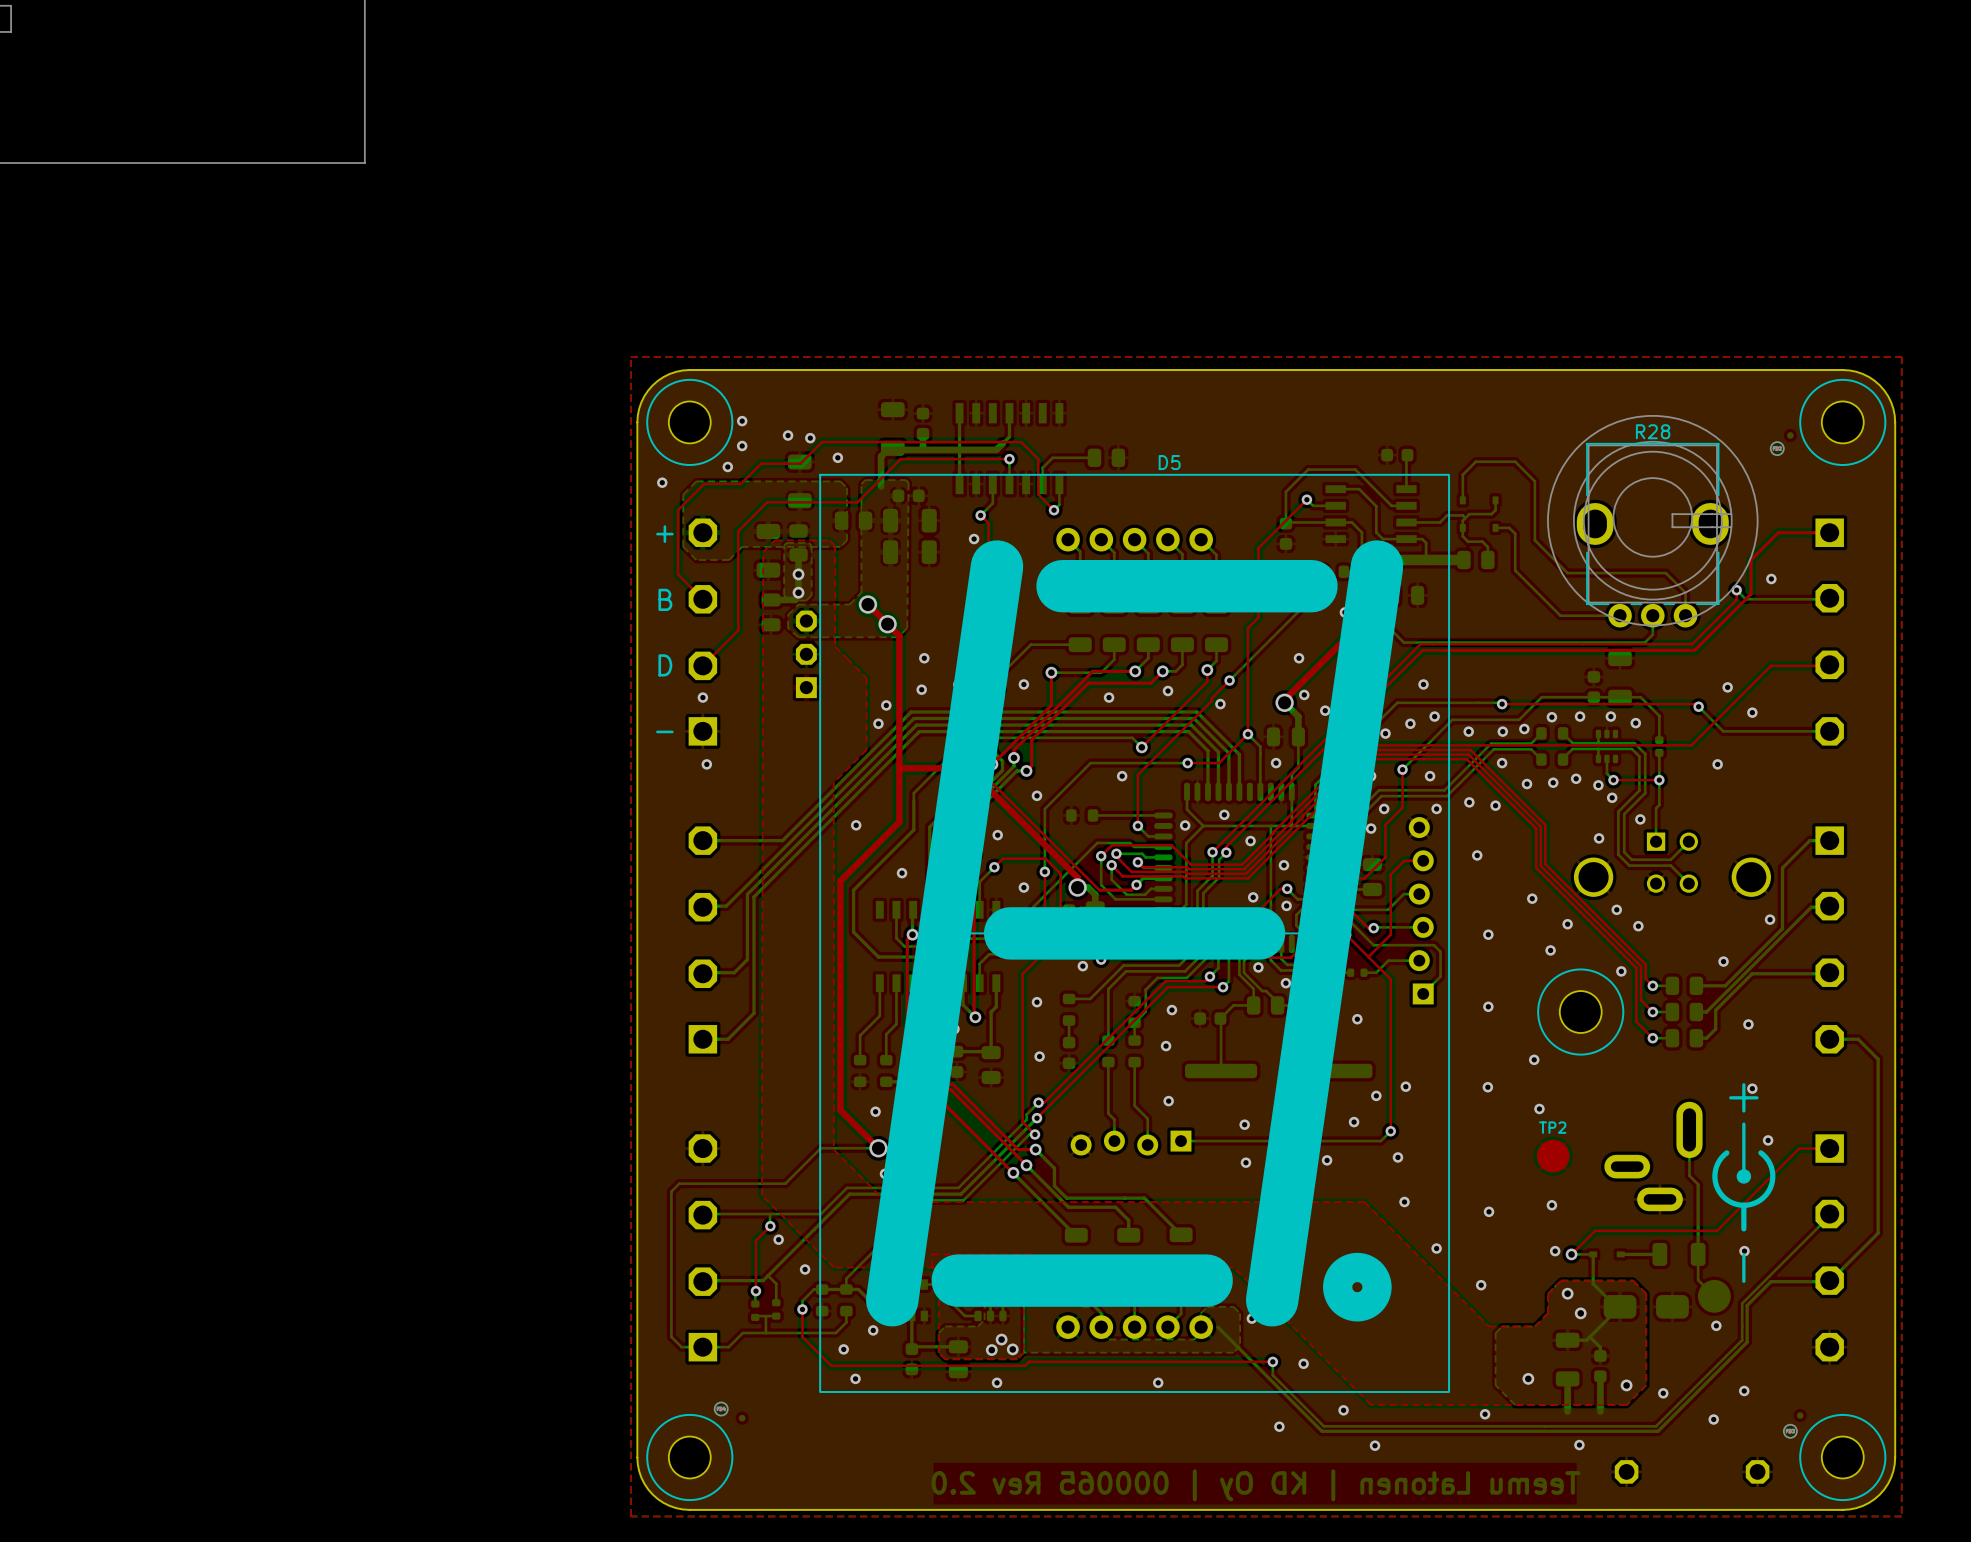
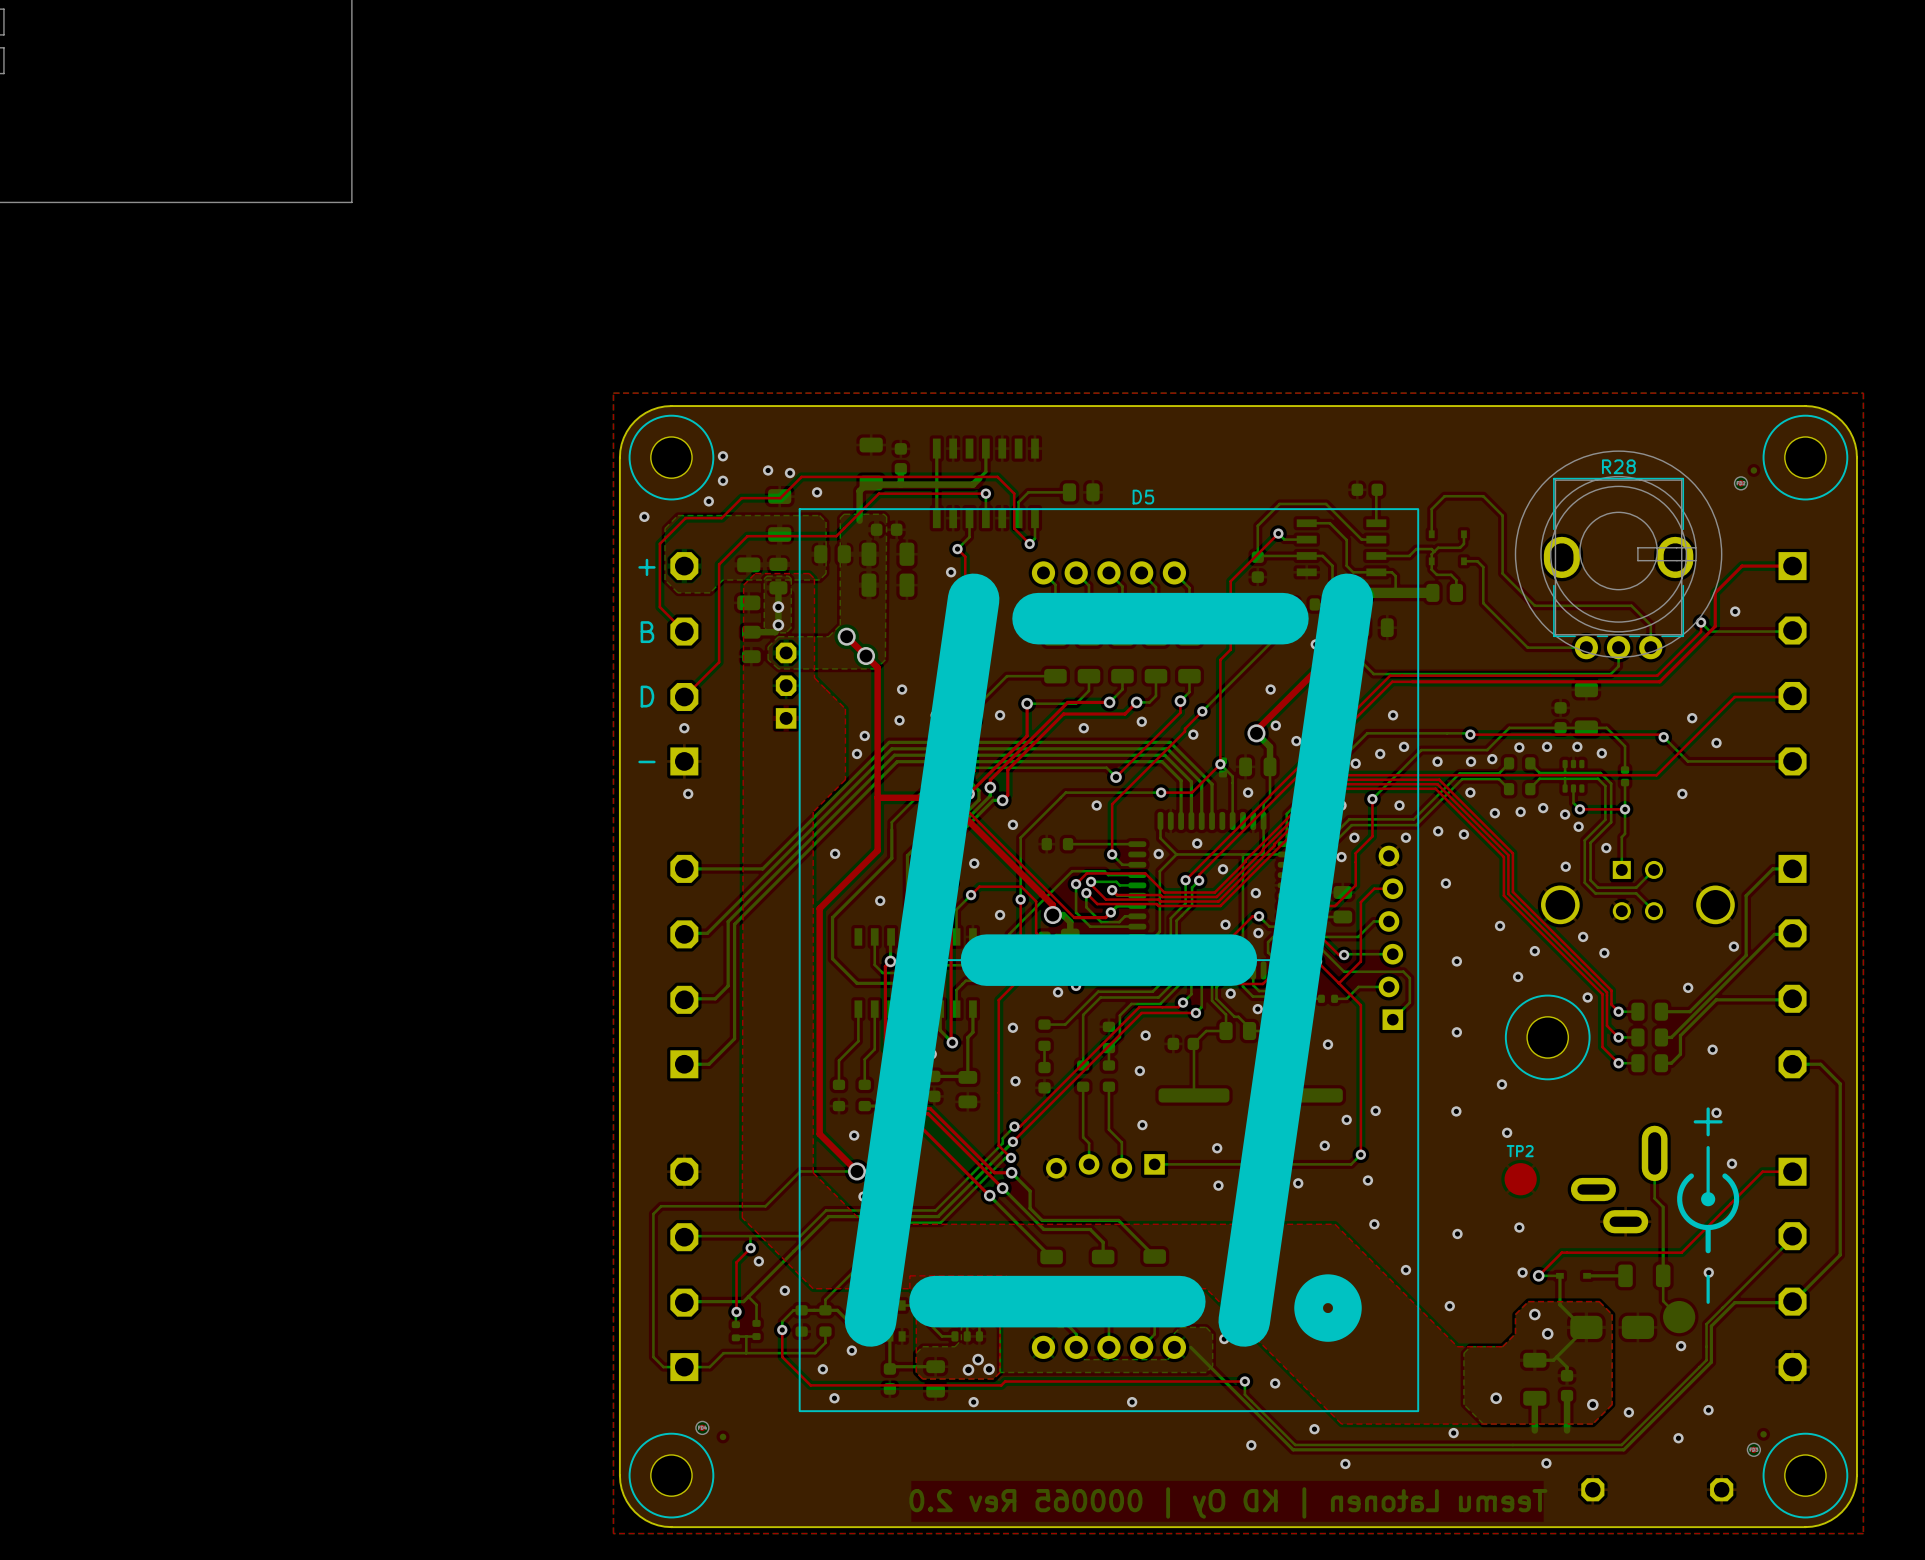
part: none -> (1222, 767)

